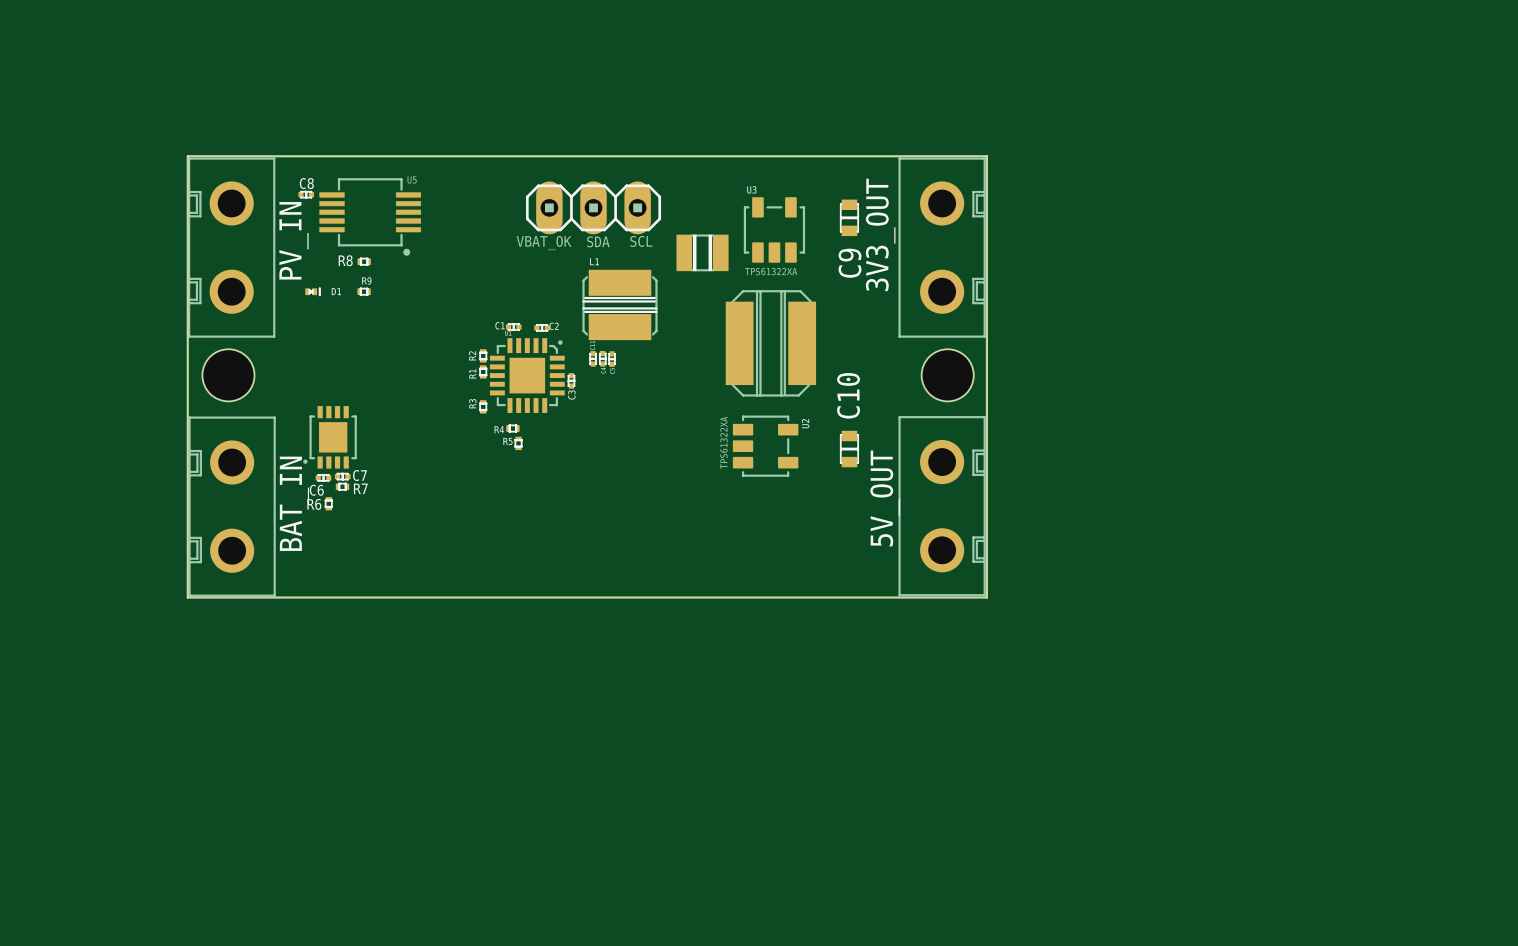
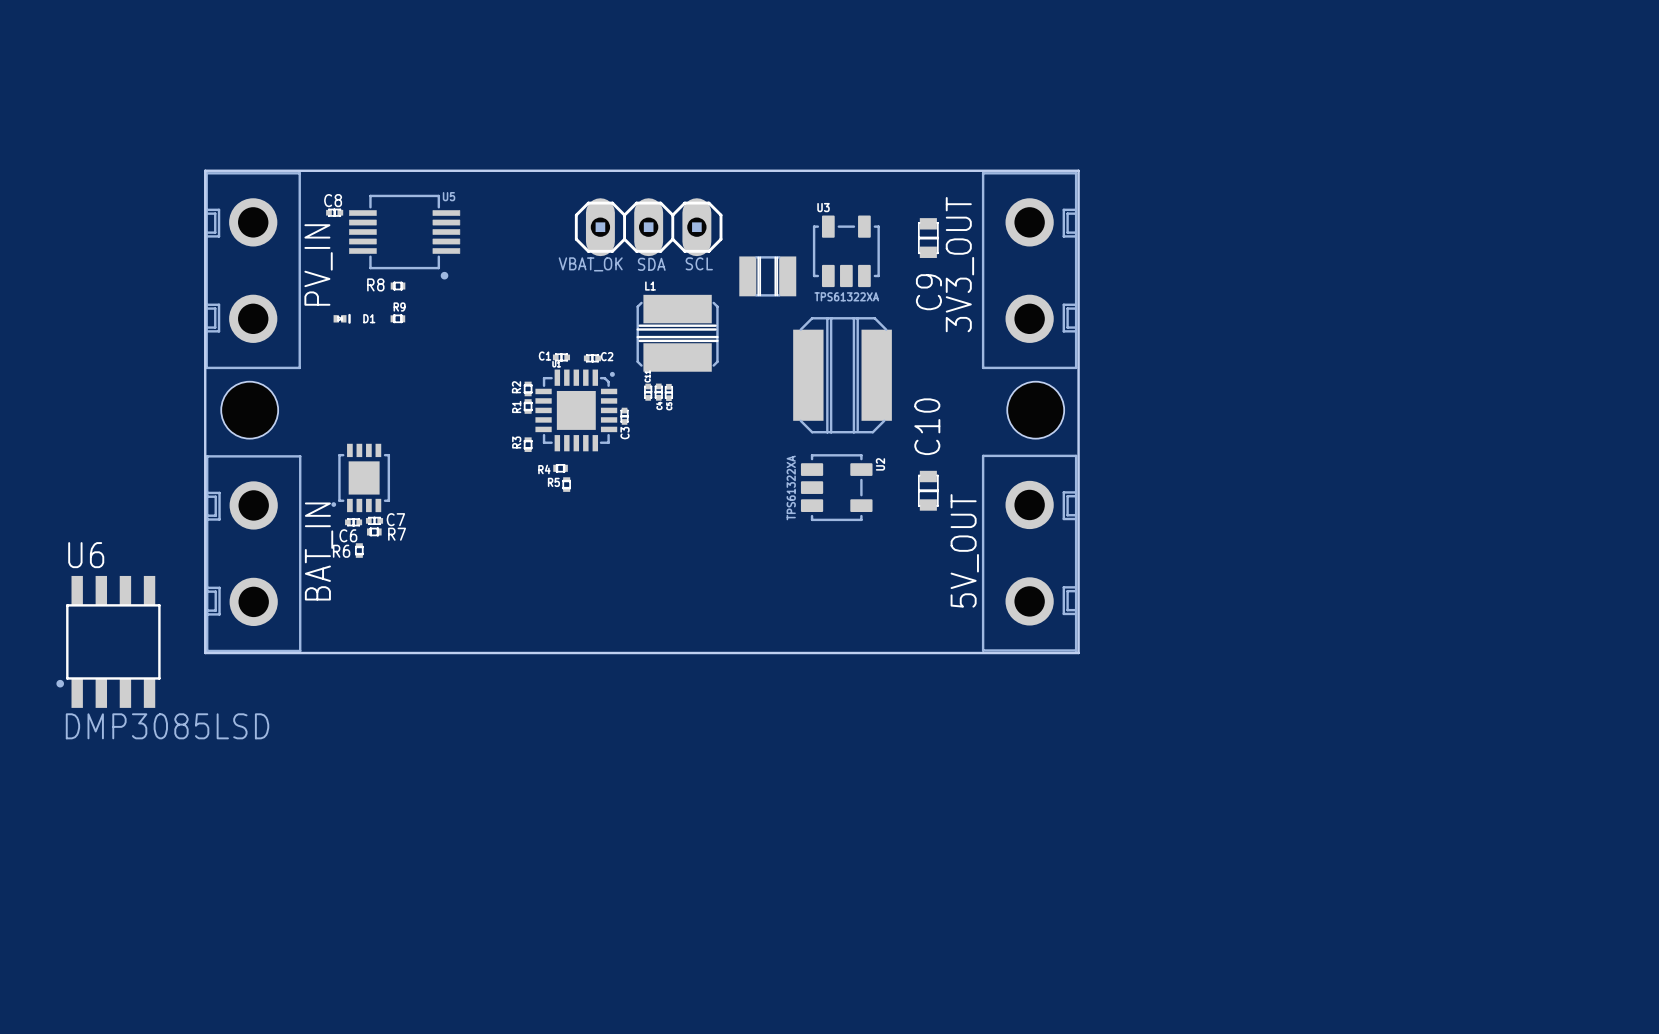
U6: none -> DMP3085LSD (108, 641)

